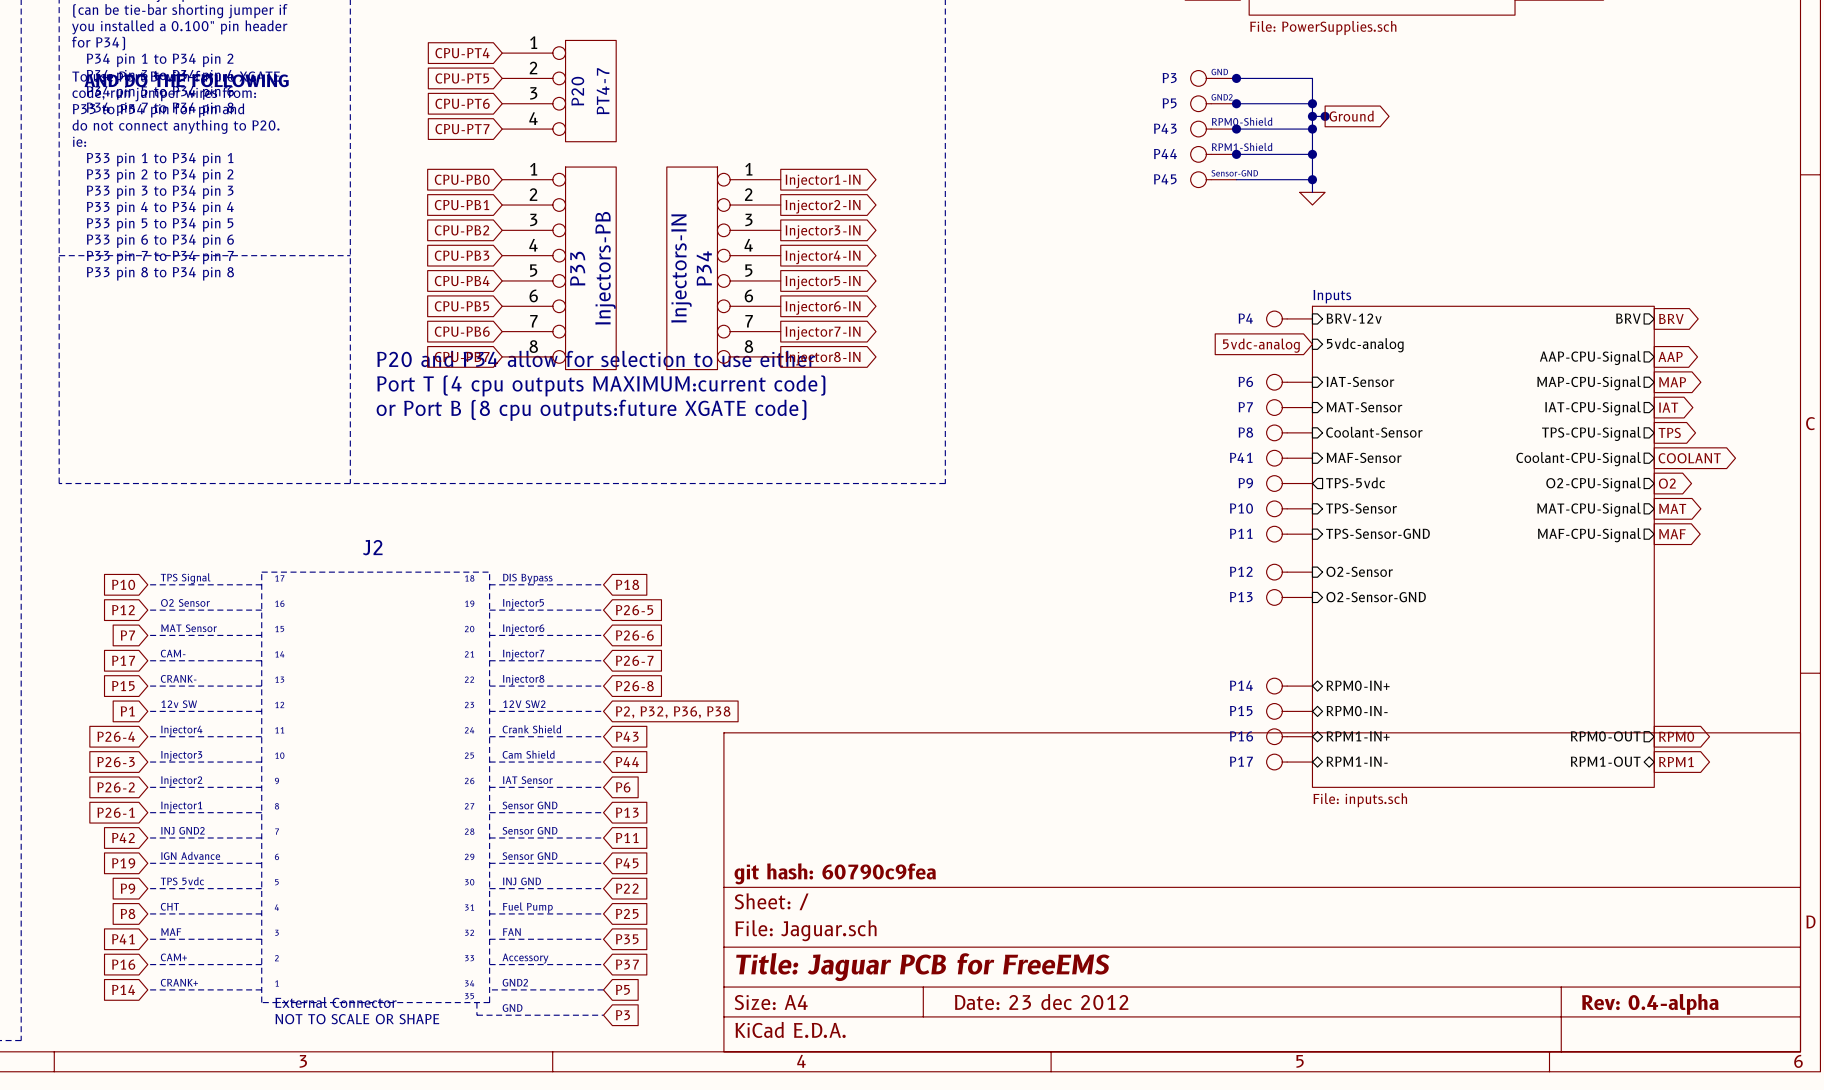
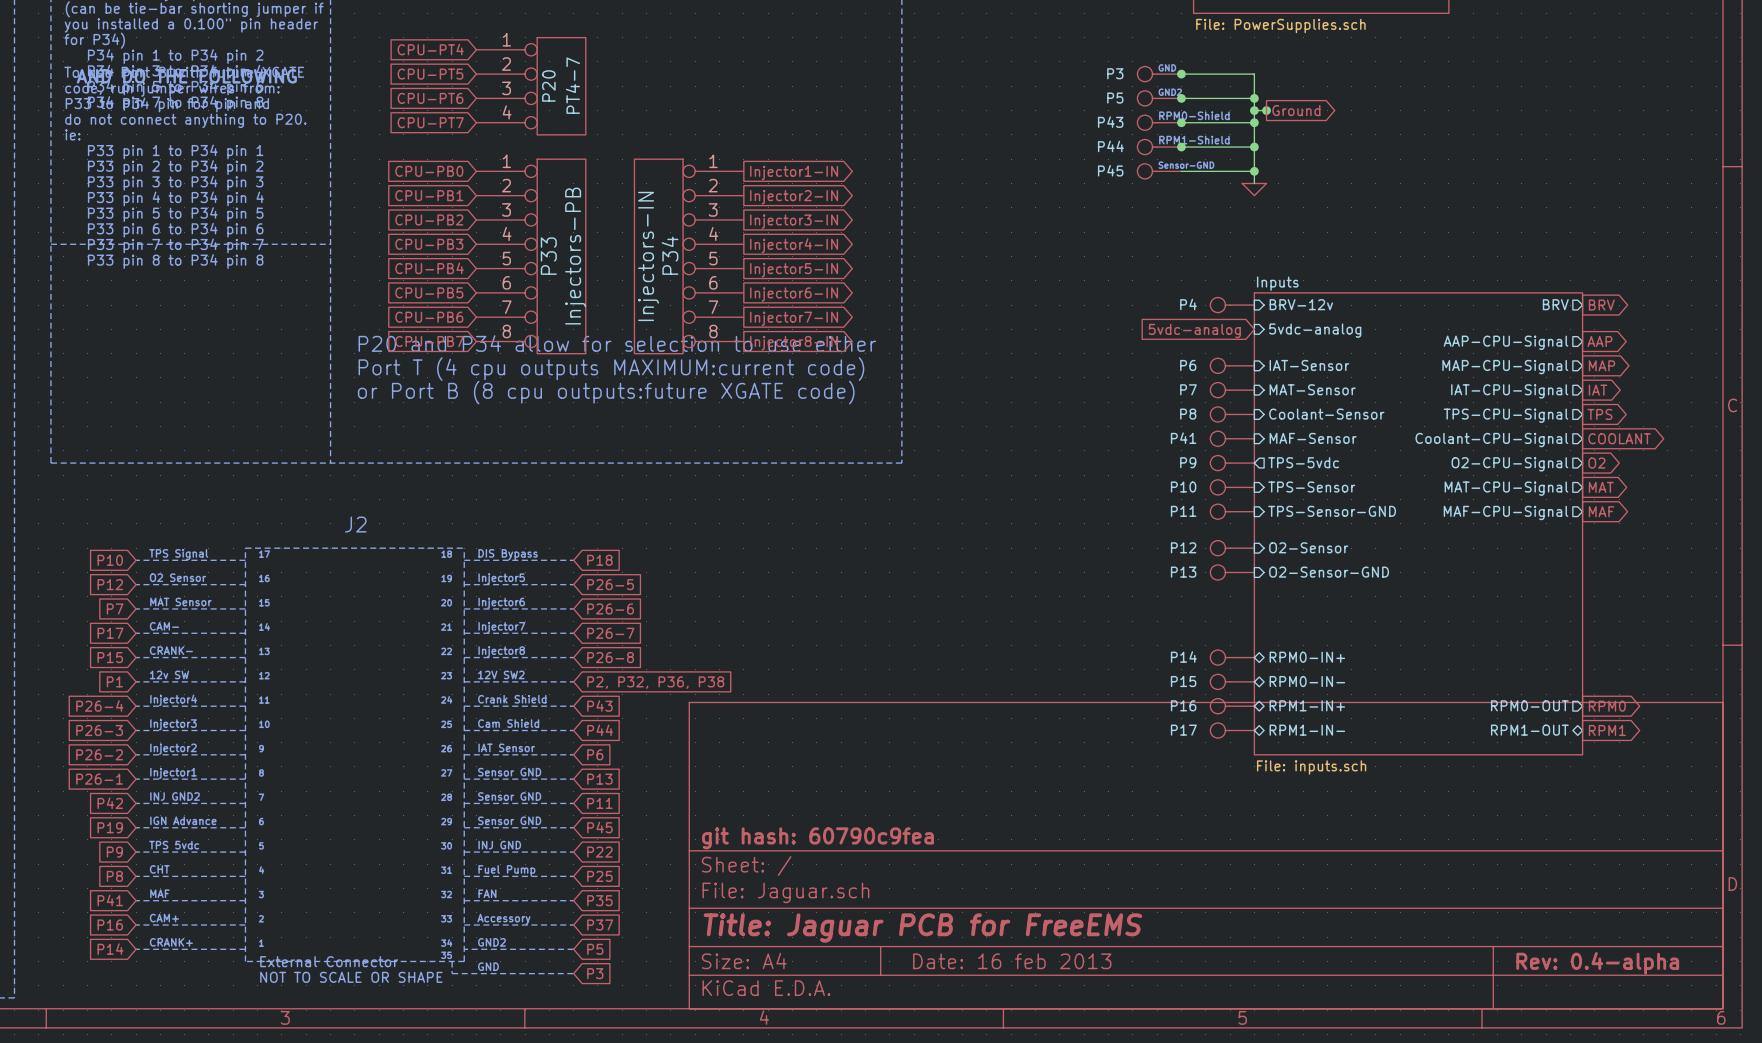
title block: Date: 23 dec 2012 (1041, 1002) -> Date: 16 feb 2013 (1012, 961)

